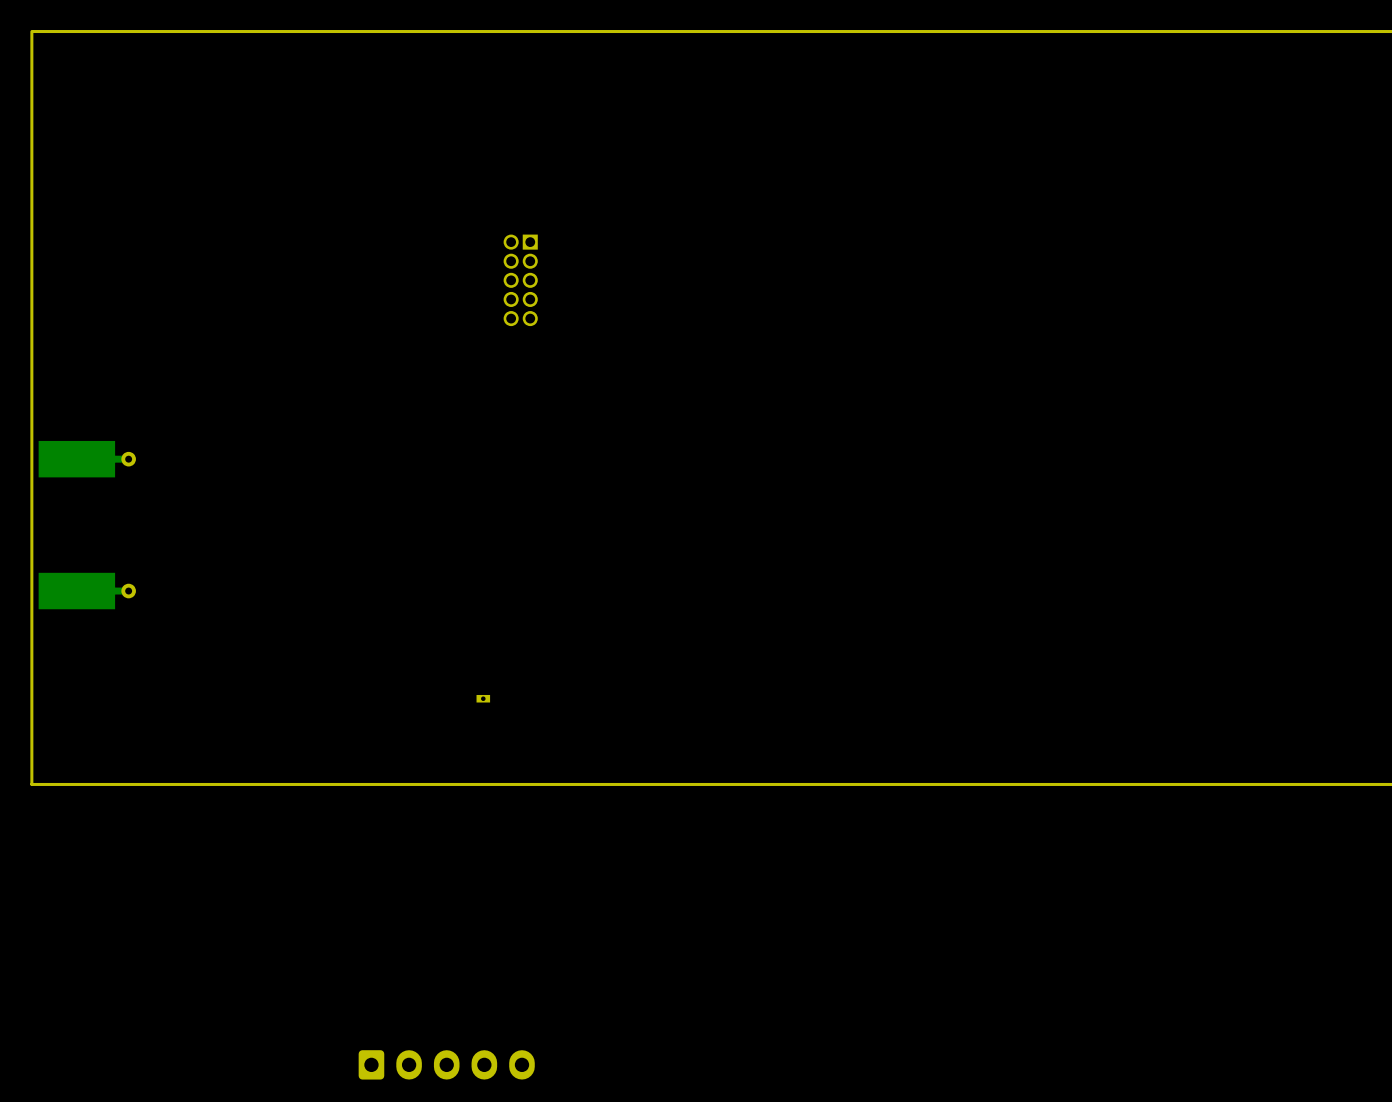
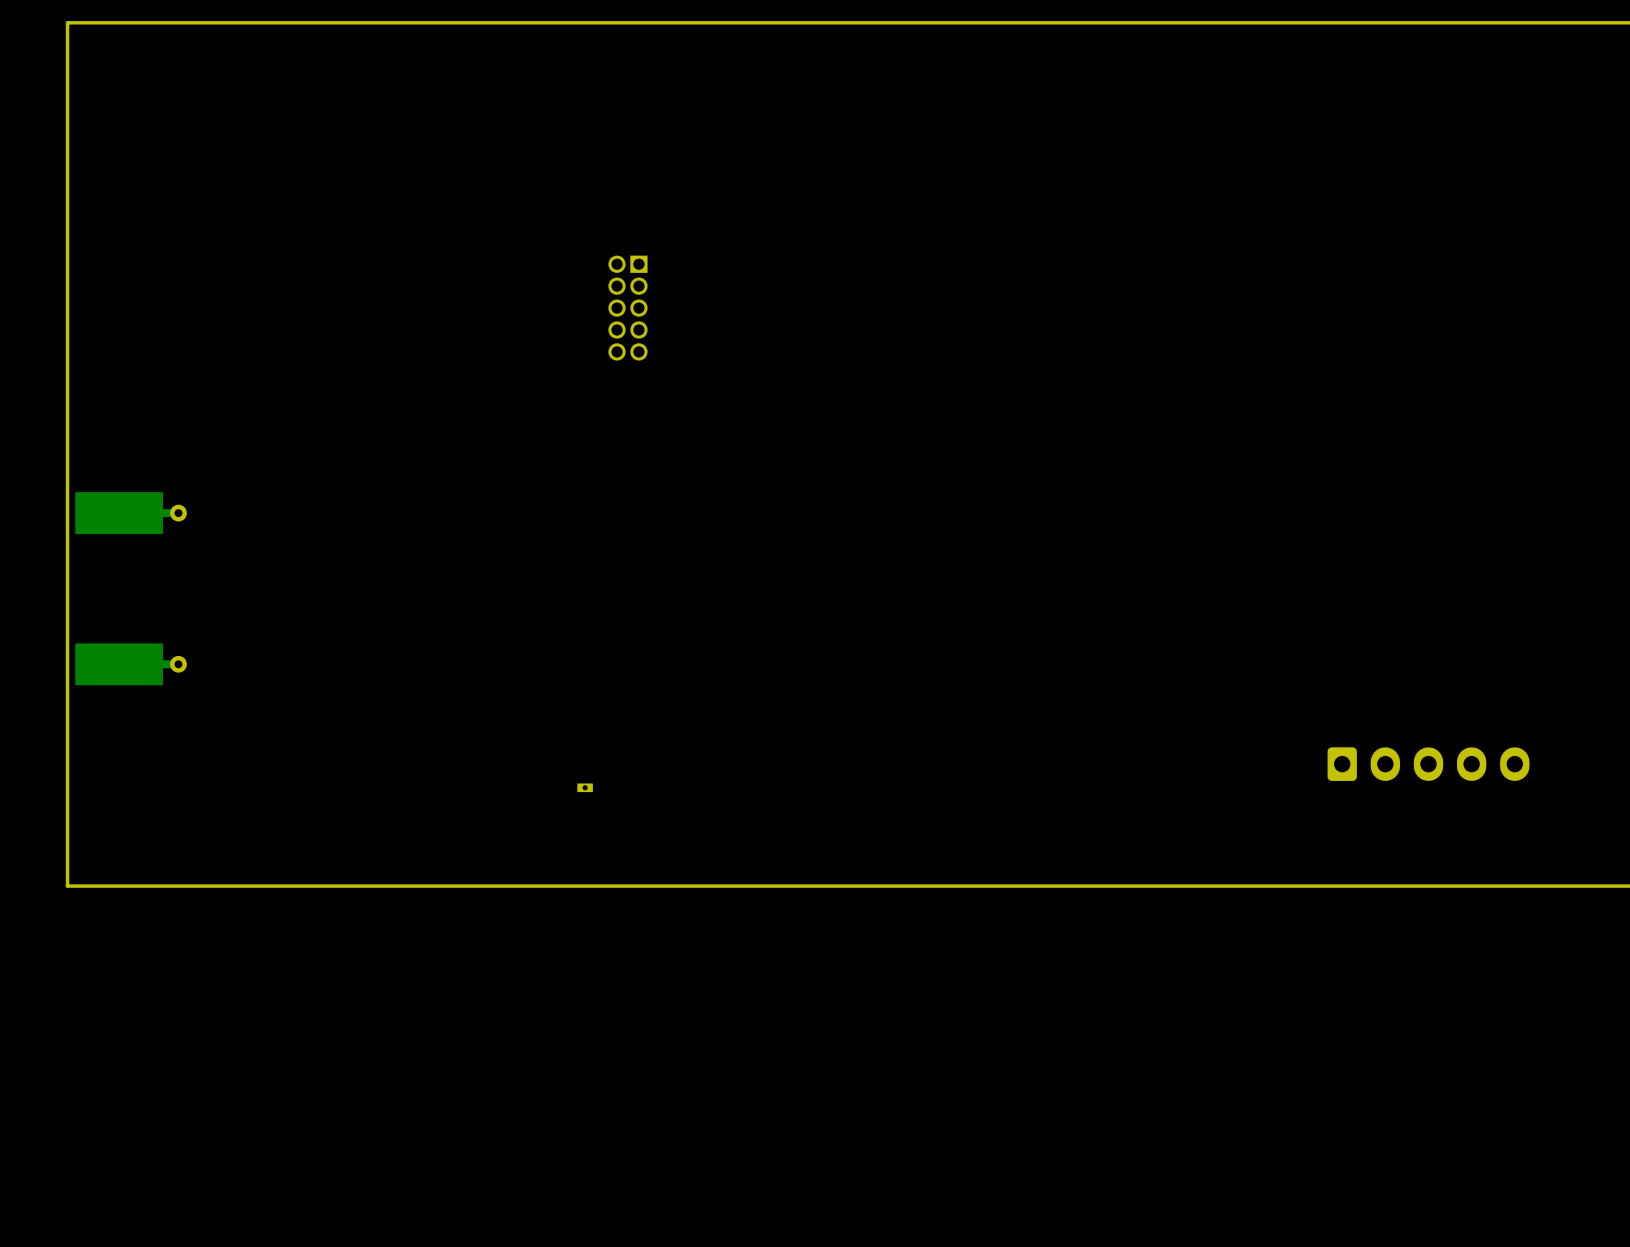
part: none -> (1428, 764)
part: (446, 1064) -> none

